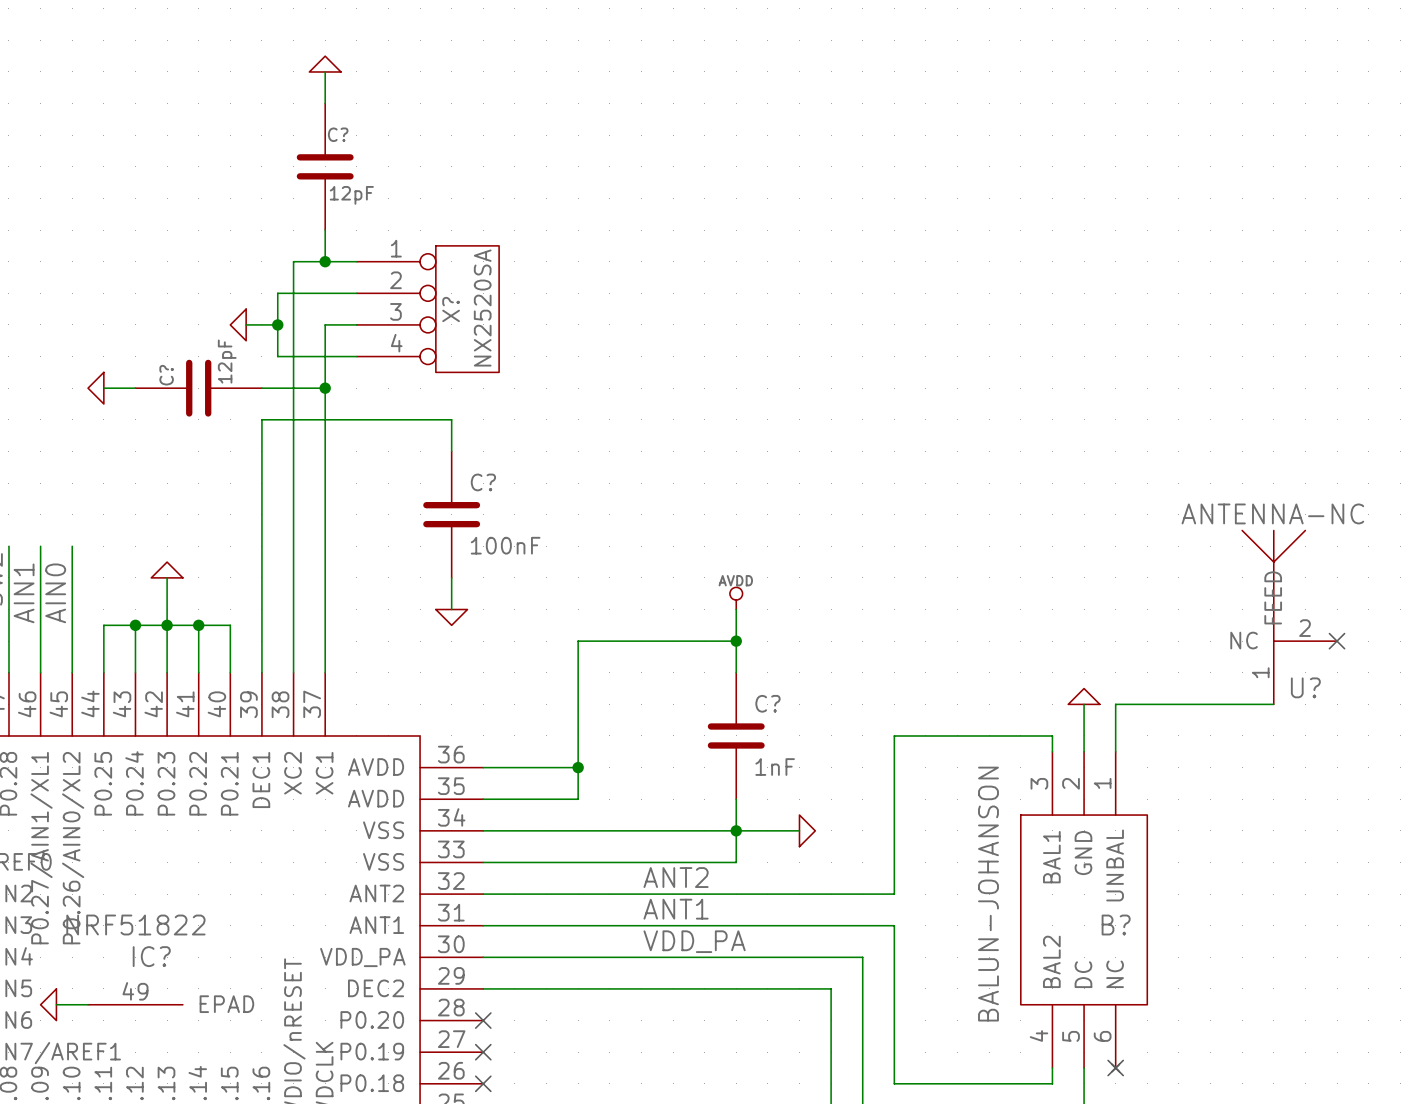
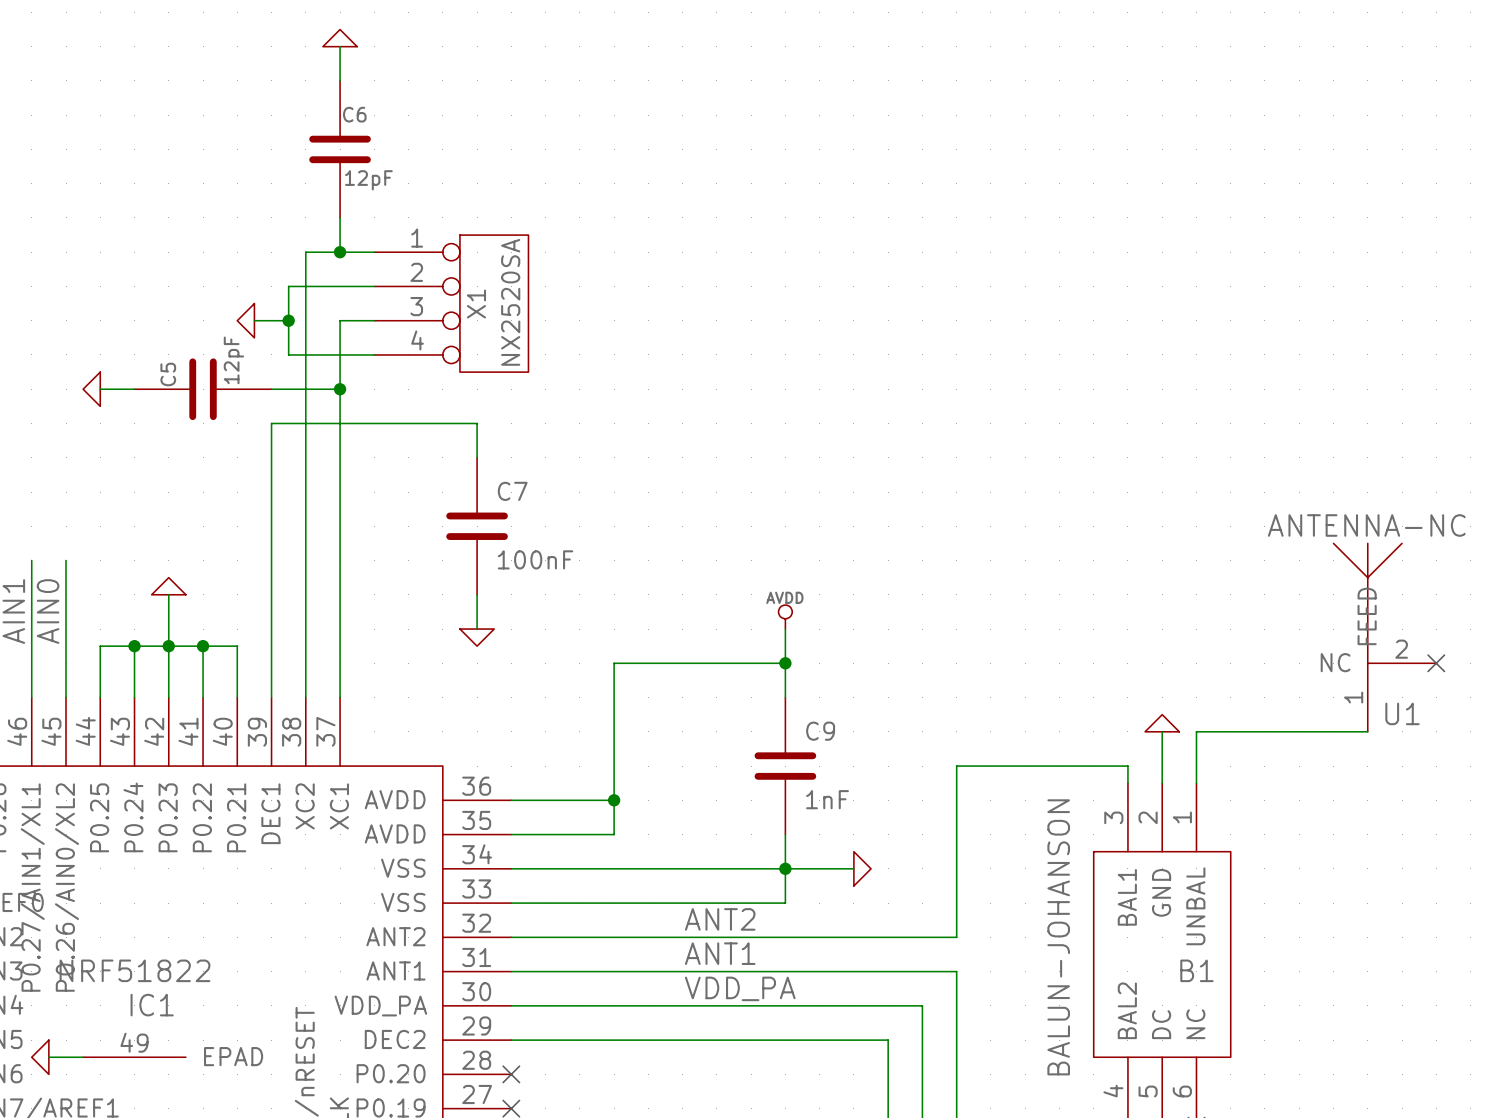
C? name: C? (338, 134) -> C6 (354, 114)
X? name: X? (451, 309) -> X1 (476, 304)
C? name: C? (166, 375) -> C5 (168, 374)
C? name: C? (483, 482) -> C7 (512, 491)
U? name: U? (1305, 687) -> U1 (1402, 713)
C? name: C? (767, 703) -> C9 (820, 731)
B? name: B? (1116, 925) -> B1 (1196, 970)
IC? name: IC? (151, 956) -> IC1 (152, 1005)

